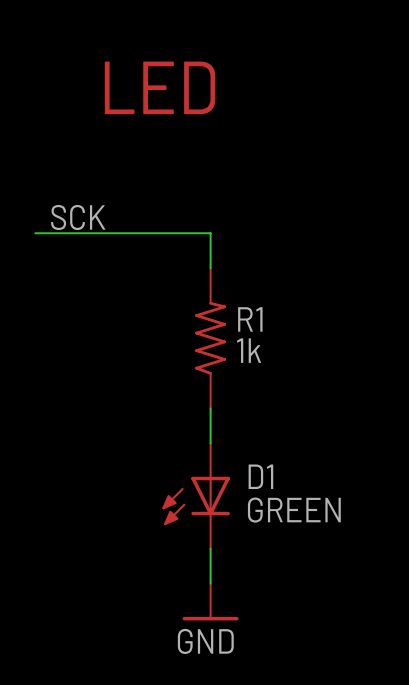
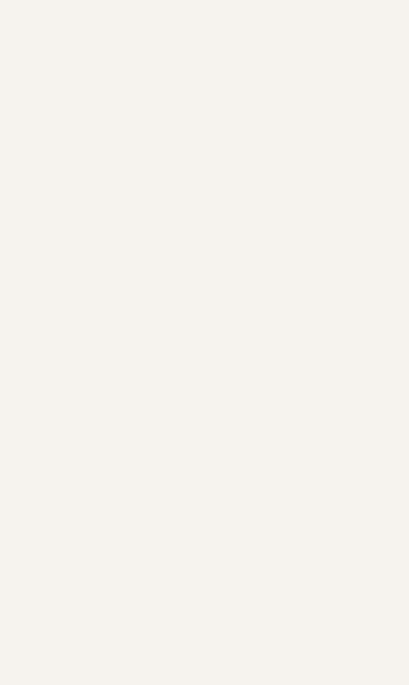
text: LED (160, 87) -> none
label: SCK (78, 217) -> none
wire: (35, 233) (210, 233) (210, 268) -> none
R1: 1k (210, 338) -> none
wire: (210, 408) (210, 443) -> none
D1: GREEN (196, 496) -> none
wire: (210, 548) (210, 583) -> none
power symbol: GND (210, 602) -> none

